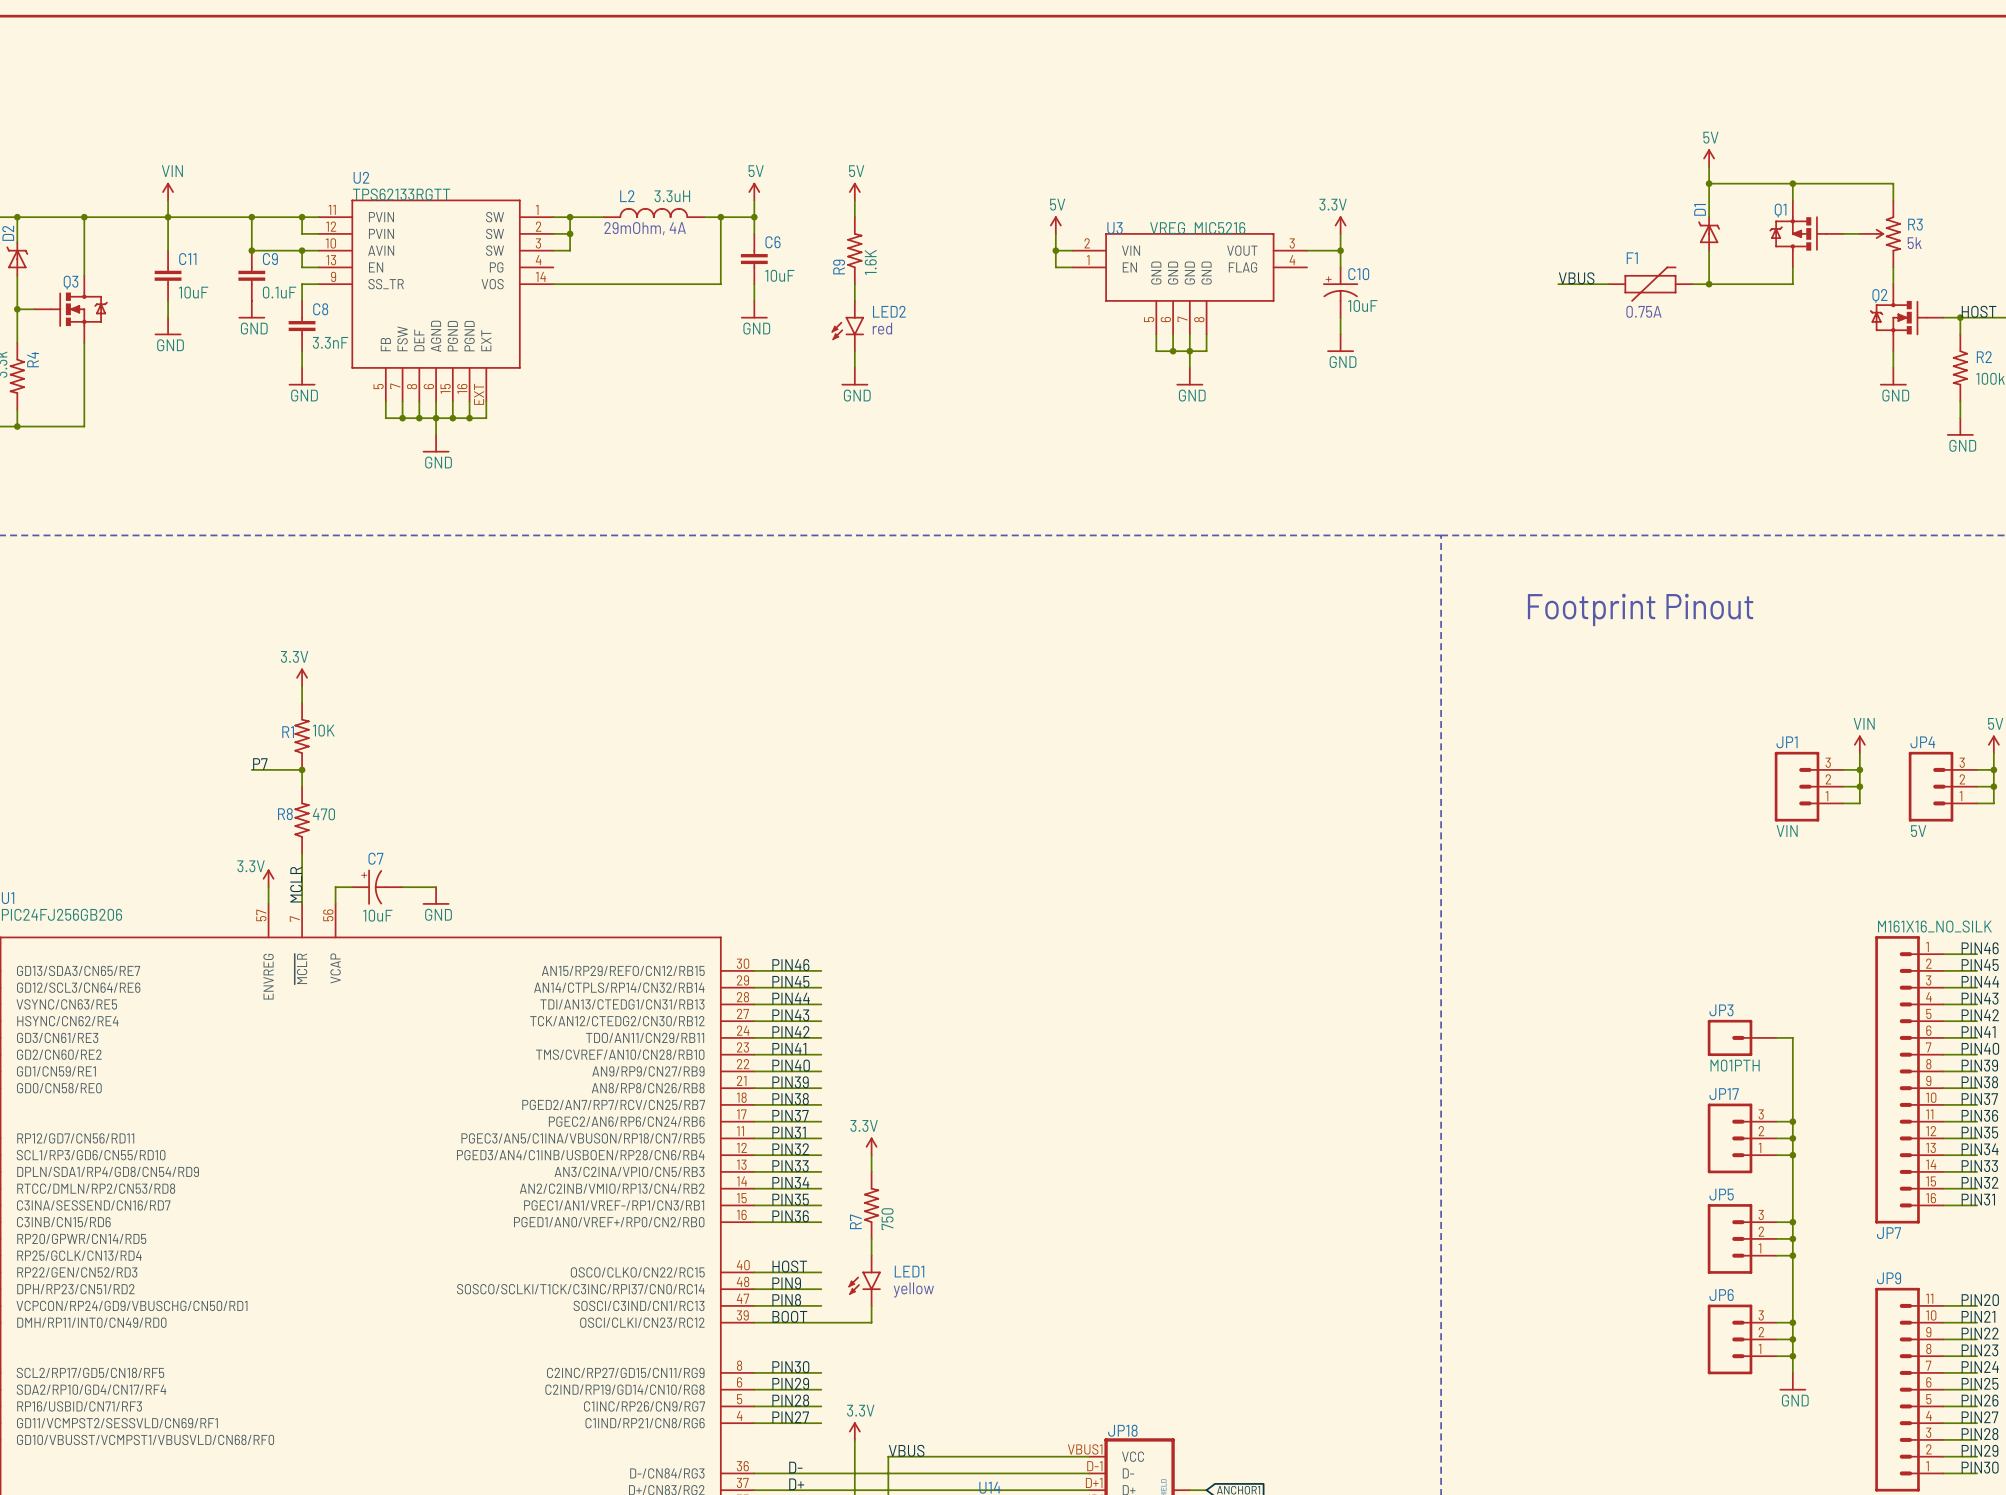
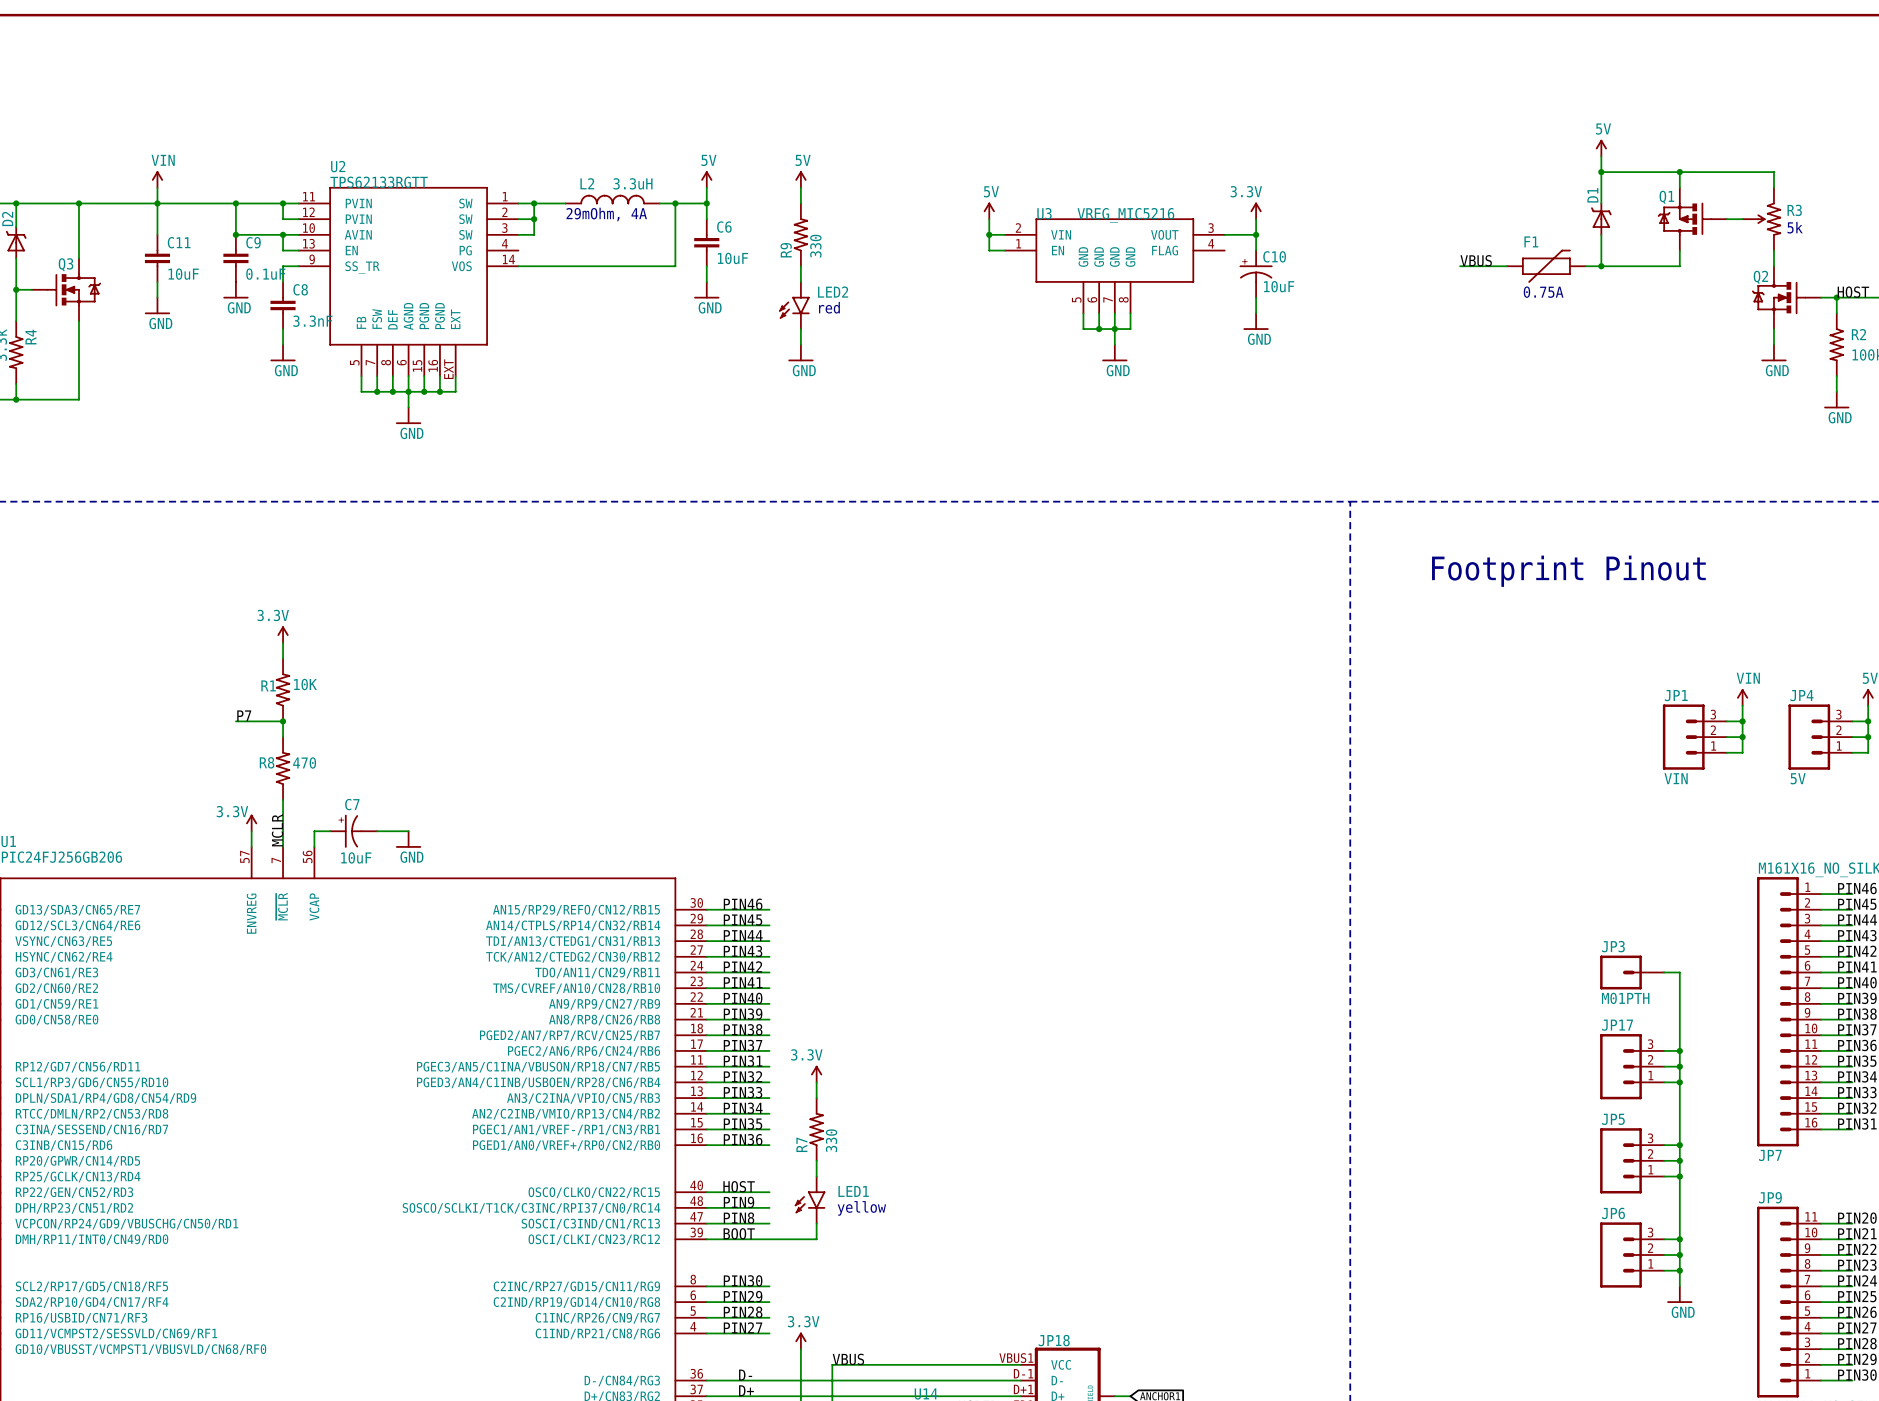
R9 value: 1.6K (870, 262) -> 330 (815, 246)
R7 value: 750 (887, 1219) -> 330 (831, 1140)

